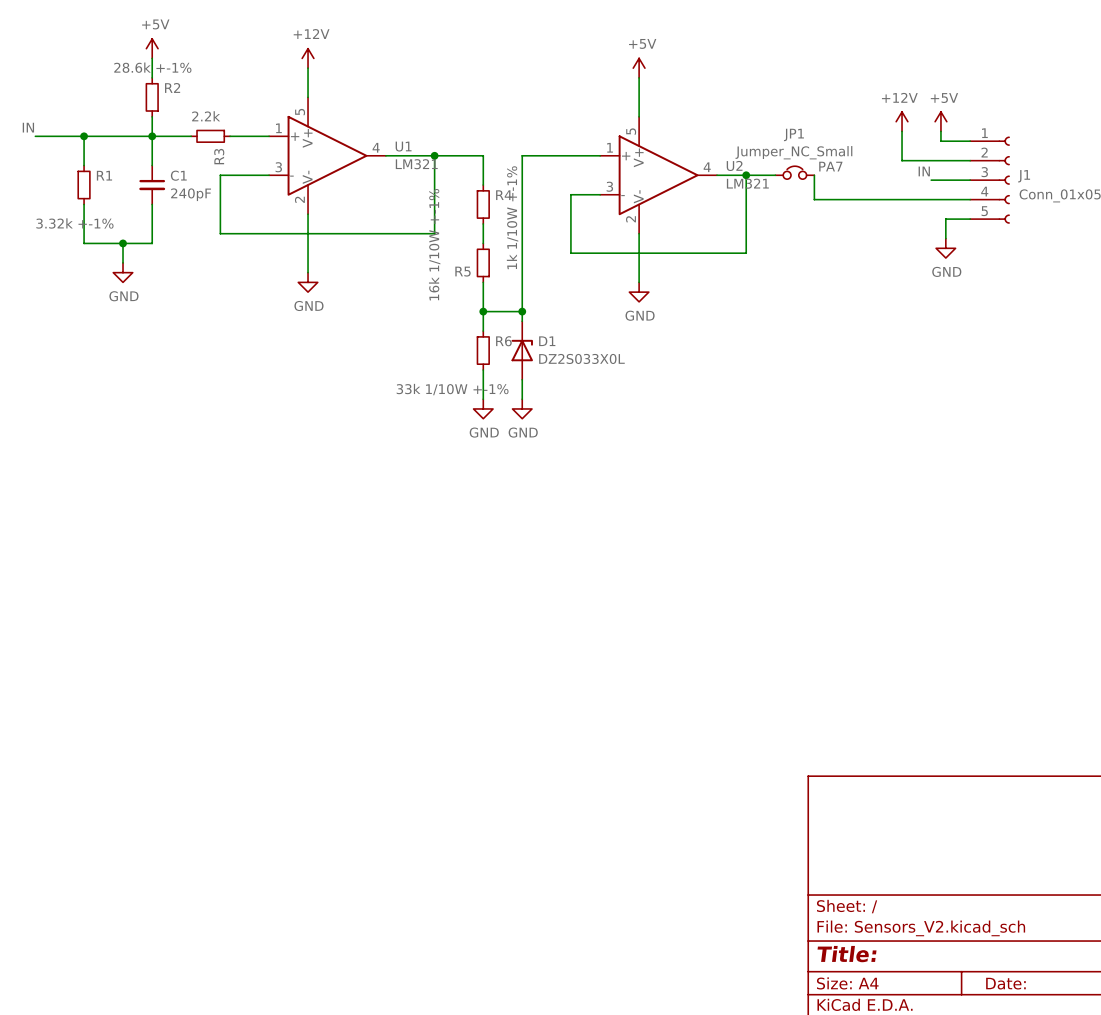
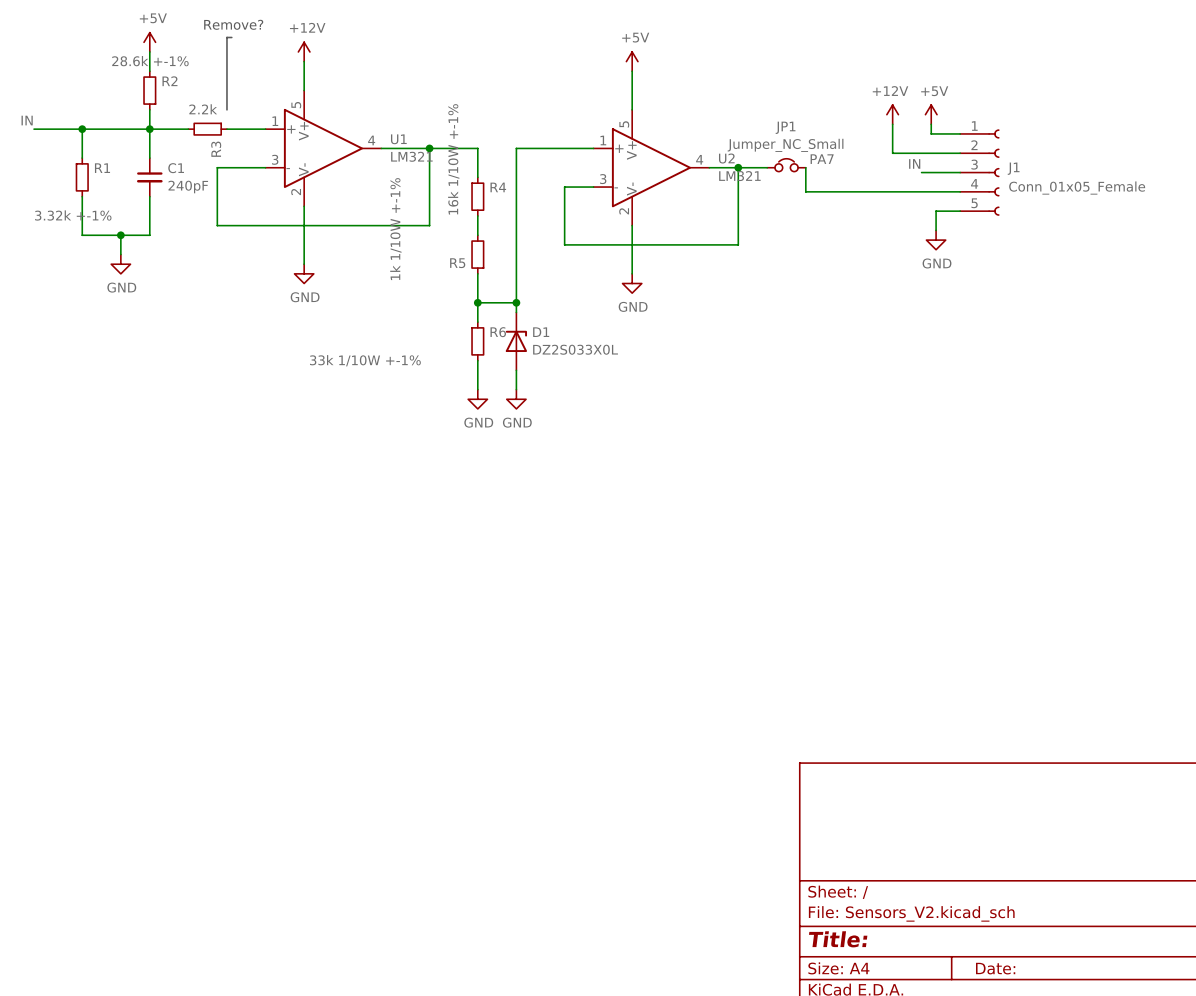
text: none -> Remove? (233, 24)
line: none -> (231, 37) (226, 37) (226, 109)
R5 value position: 1k 1/10W +-1% (512, 217) -> 1k 1/10W +-1% (395, 229)
R4 value position: 16k 1/10W +-1% (434, 244) -> 16k 1/10W +-1% (453, 159)
R6 value position: 33k 1/10W +-1% (452, 389) -> 33k 1/10W +-1% (365, 360)

